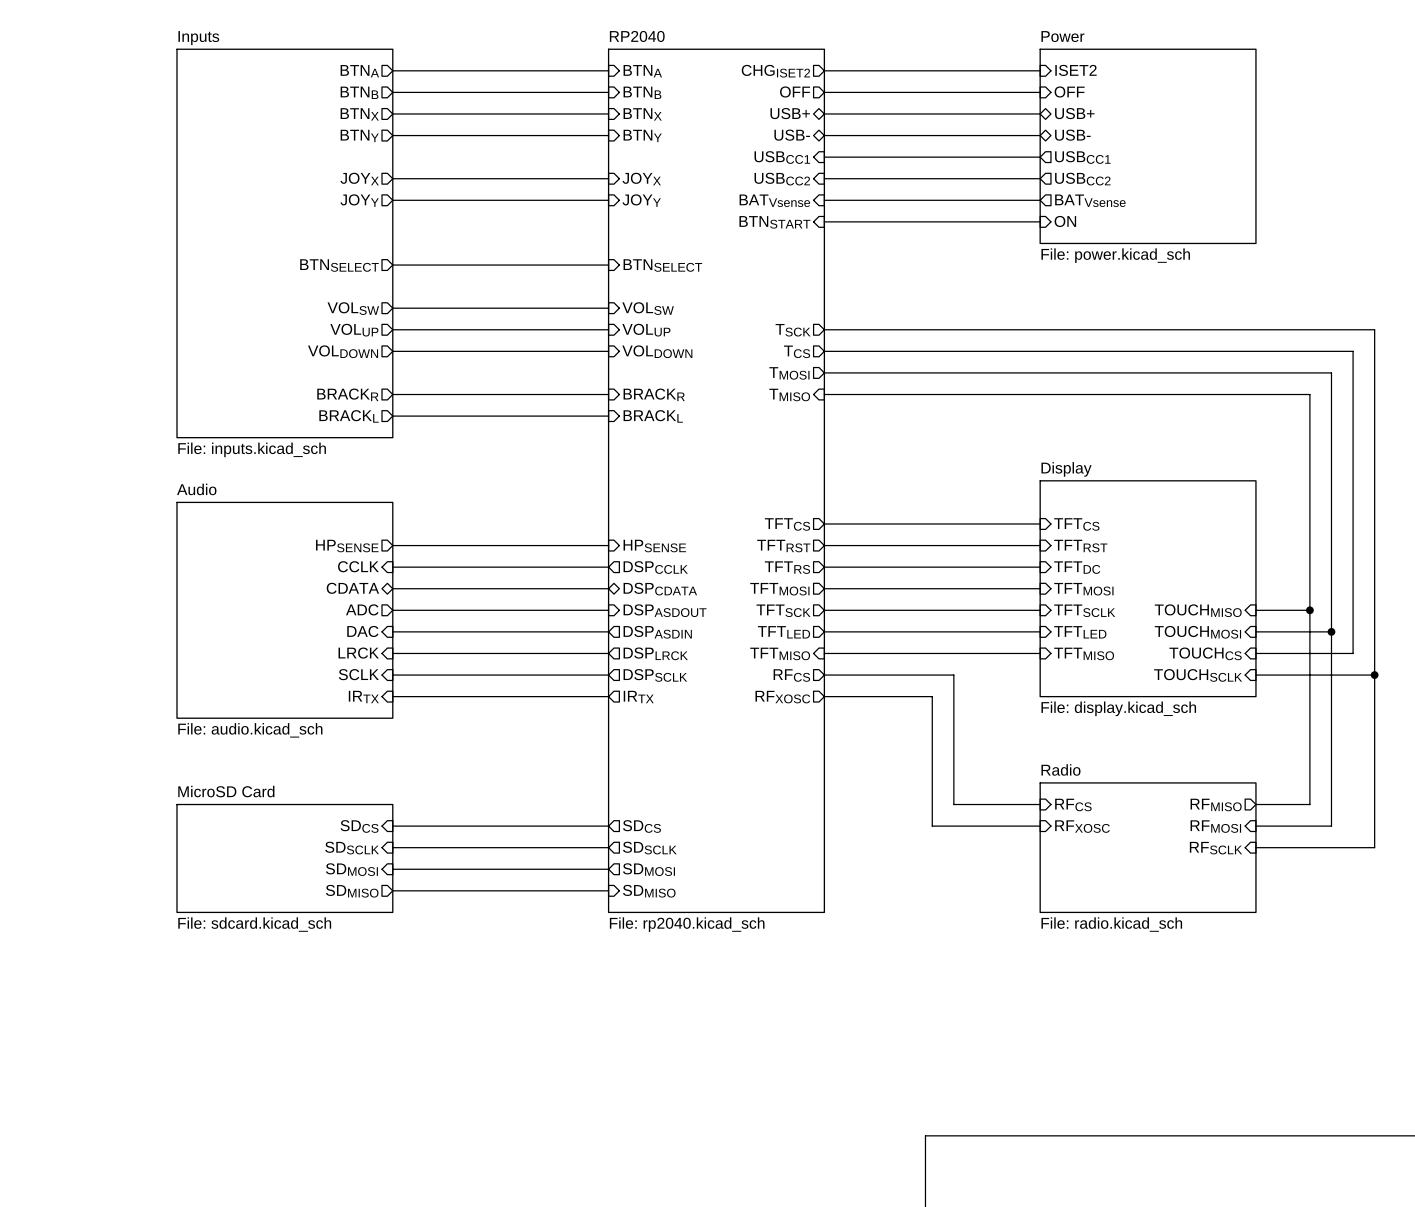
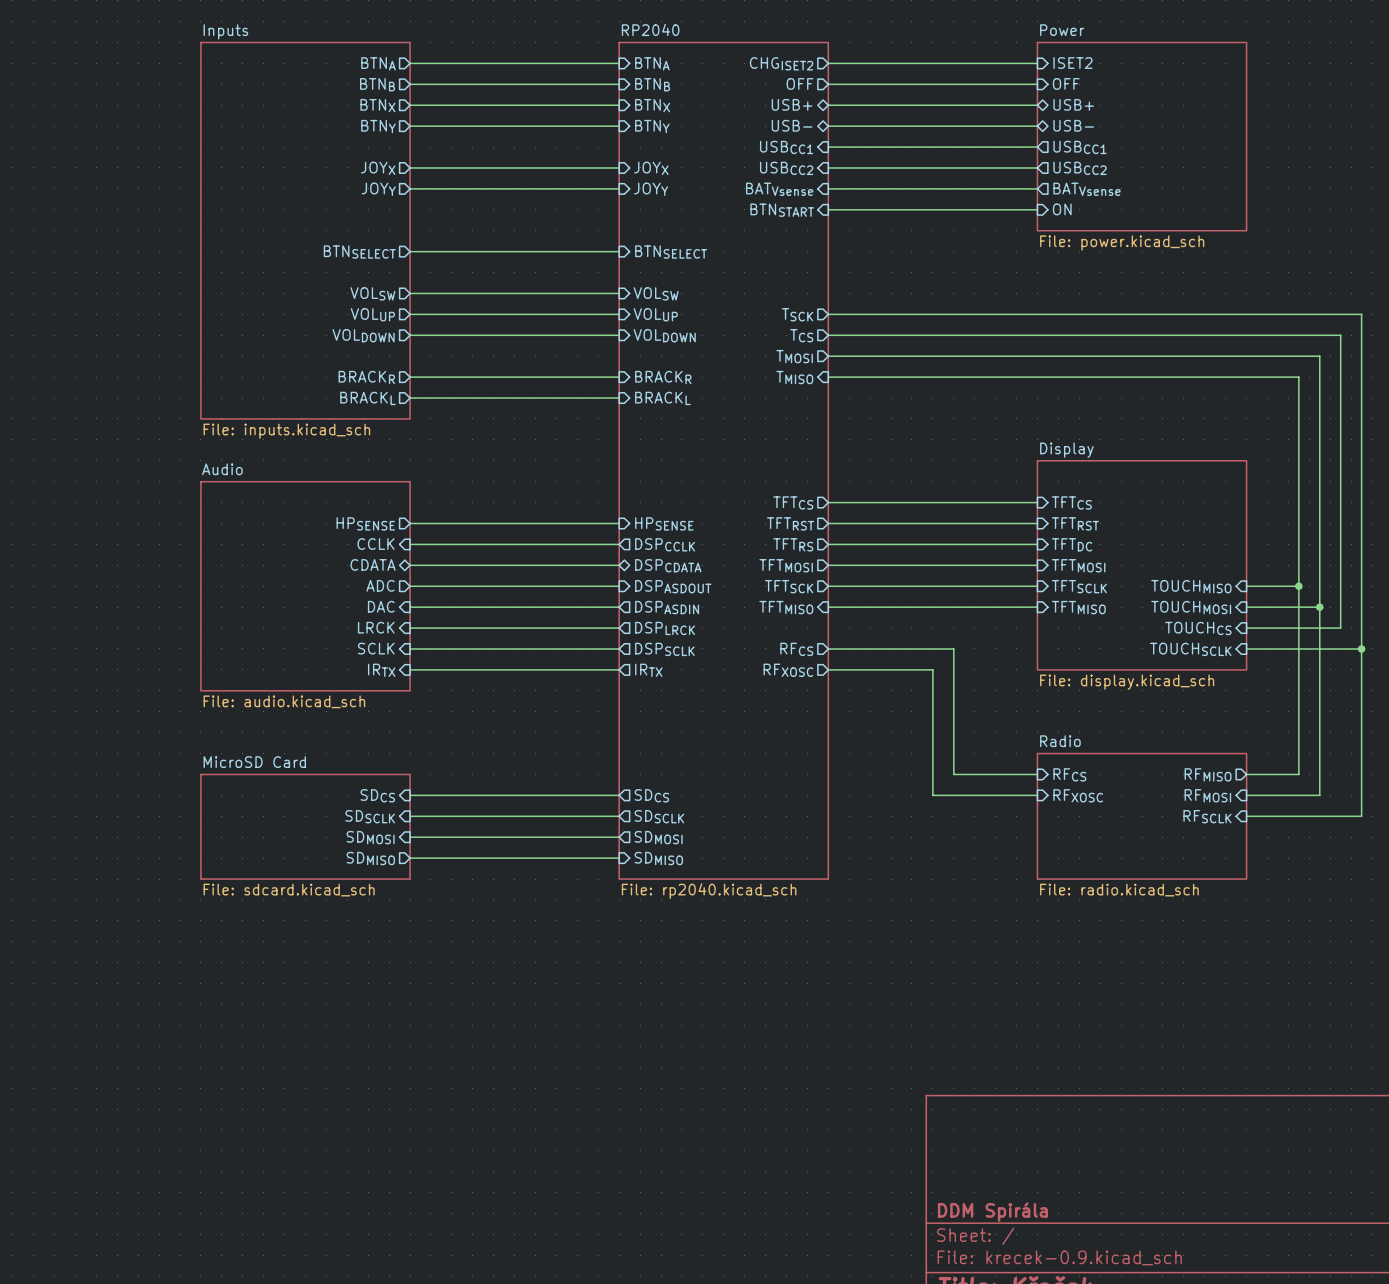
sheet pin shape: output (783, 632) -> input (786, 607)
sheet pin: TFTLED (783, 632) -> TFTMISO (786, 607)
sheet pin: TFTLED (1080, 632) -> TFTMISO (1078, 607)
sheet pin: TFTMISO (780, 653) -> none
wire: (824, 653) (1040, 653) -> none
sheet pin: TFTMISO (1084, 653) -> none

